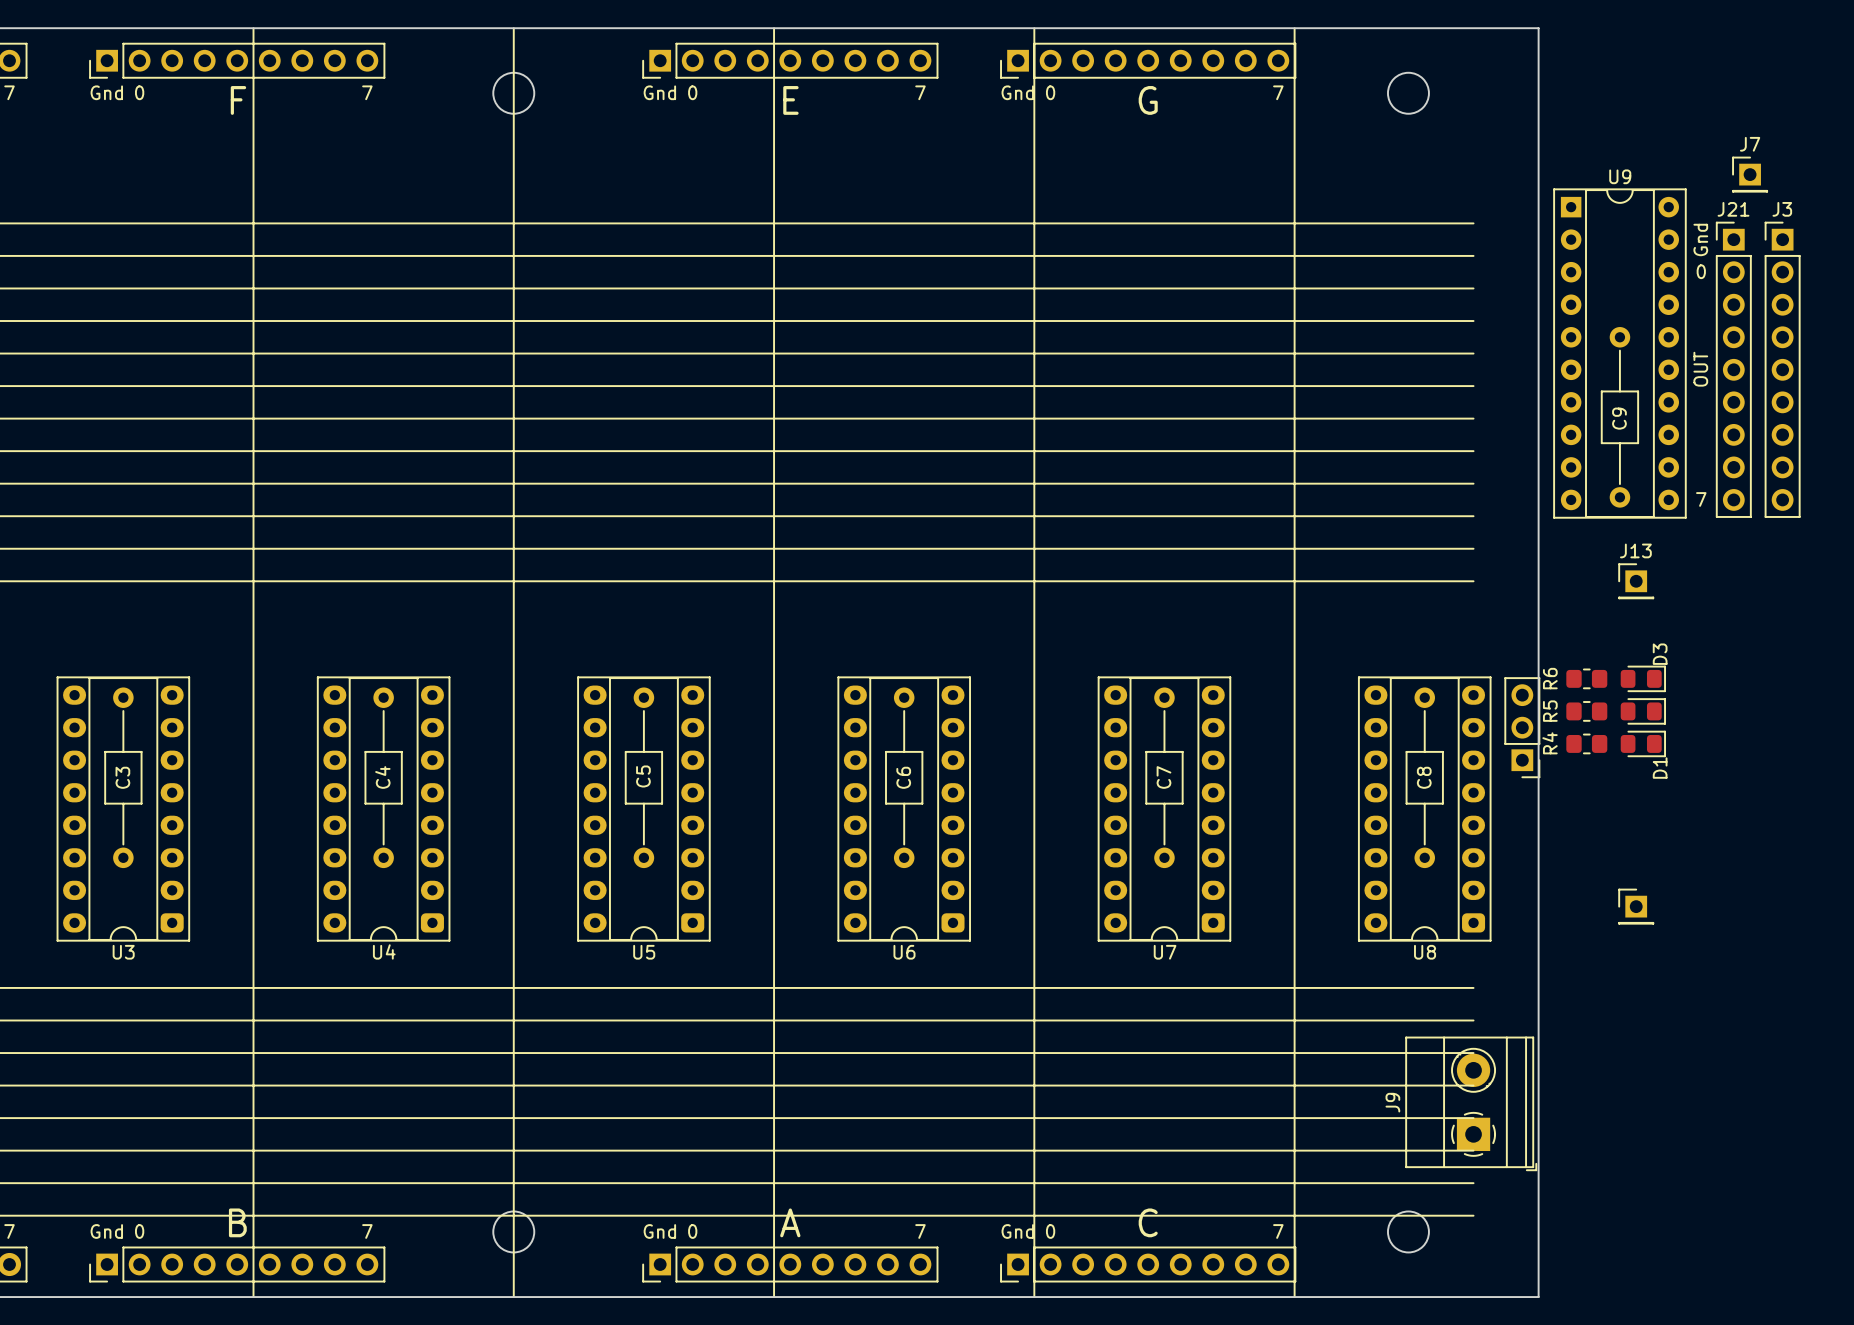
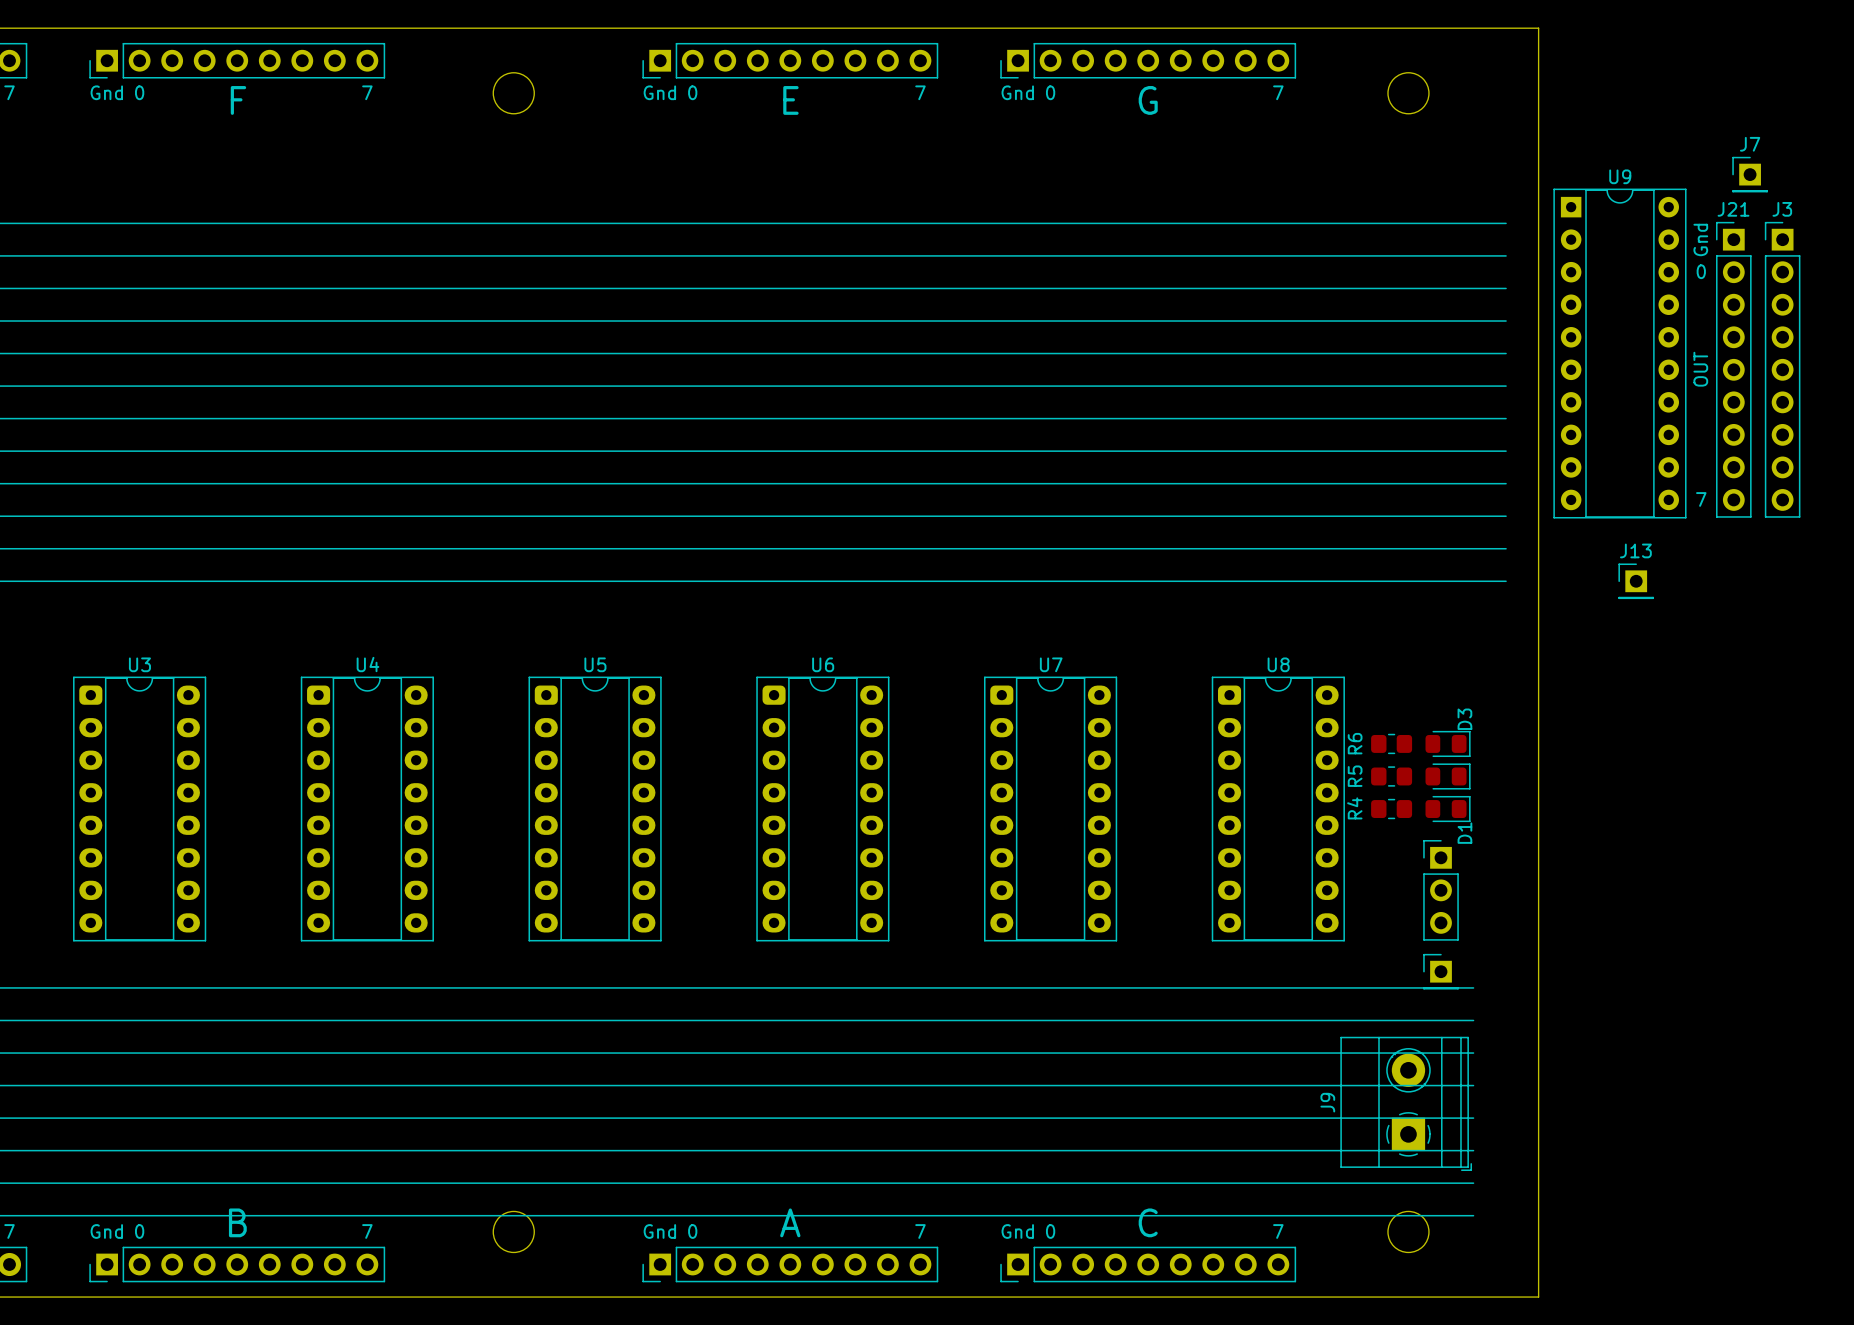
line: (253, 28) (253, 1297) -> none
line: (513, 28) (513, 1297) -> none
line: (774, 28) (774, 1297) -> none
line: (1034, 28) (1034, 1297) -> none
line: (1294, 28) (1294, 1297) -> none
line: none -> (1473, 223) (1506, 223)
line: none -> (1473, 255) (1506, 255)
line: none -> (1473, 288) (1506, 288)
line: none -> (1473, 321) (1506, 321)
line: none -> (1473, 353) (1506, 353)
line: none -> (1473, 386) (1506, 386)
C9: (1619, 417) -> none
line: none -> (1473, 418) (1506, 418)
line: none -> (1473, 451) (1506, 451)
line: none -> (1473, 483) (1506, 483)
line: none -> (1473, 516) (1506, 516)
line: none -> (1473, 548) (1506, 548)
line: none -> (1473, 581) (1506, 581)
R6 position: (1586, 678) -> (1391, 743)
D3 position: (1643, 678) -> (1448, 743)
R5 position: (1586, 711) -> (1391, 776)
part position: (1643, 711) -> (1448, 776)
part rotation: 0° (1522, 727) -> 180° (1441, 890)
part position: (1522, 727) -> (1441, 890)
R4 position: (1586, 743) -> (1391, 809)
D1 position: (1643, 743) -> (1448, 809)
C3: (123, 777) -> none
C4: (383, 777) -> none
C5: (643, 777) -> none
C6: (904, 777) -> none
C7: (1164, 777) -> none
C8: (1424, 777) -> none
U3 rotation: 0° (123, 809) -> 180° (139, 809)
U4 rotation: 0° (383, 809) -> 180° (367, 809)
U5 rotation: 0° (643, 809) -> 180° (595, 809)
U6 rotation: 0° (904, 809) -> 180° (822, 809)
U7 rotation: 0° (1164, 809) -> 180° (1050, 809)
U8 rotation: 0° (1424, 809) -> 180° (1278, 809)
part position: (1636, 906) -> (1441, 971)
J9 position: (1471, 1103) -> (1406, 1103)

